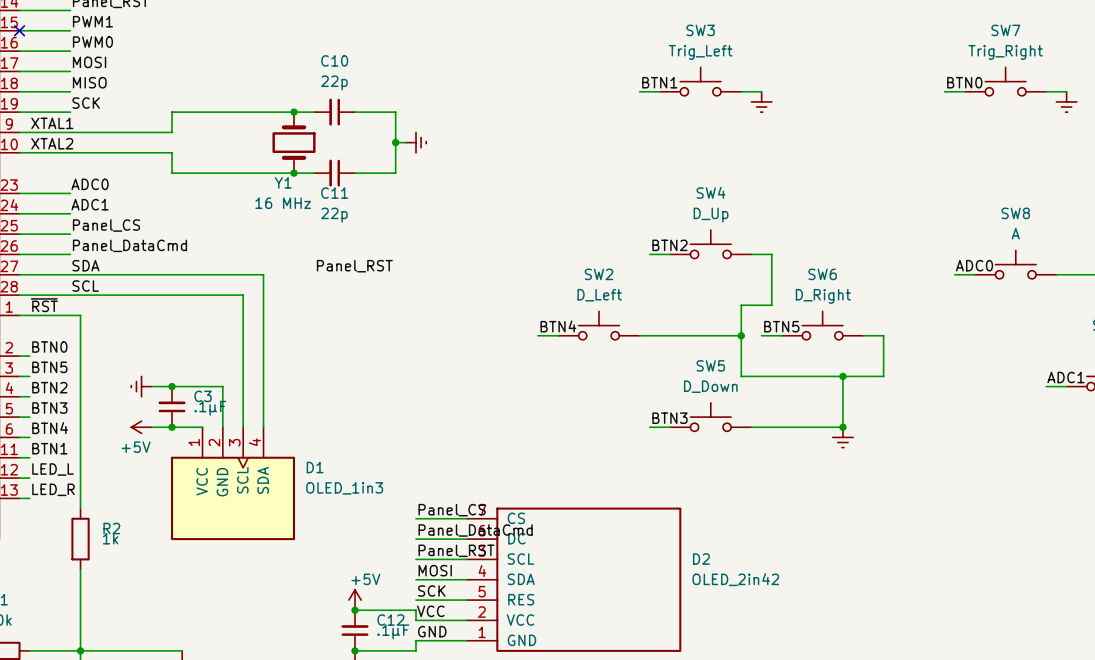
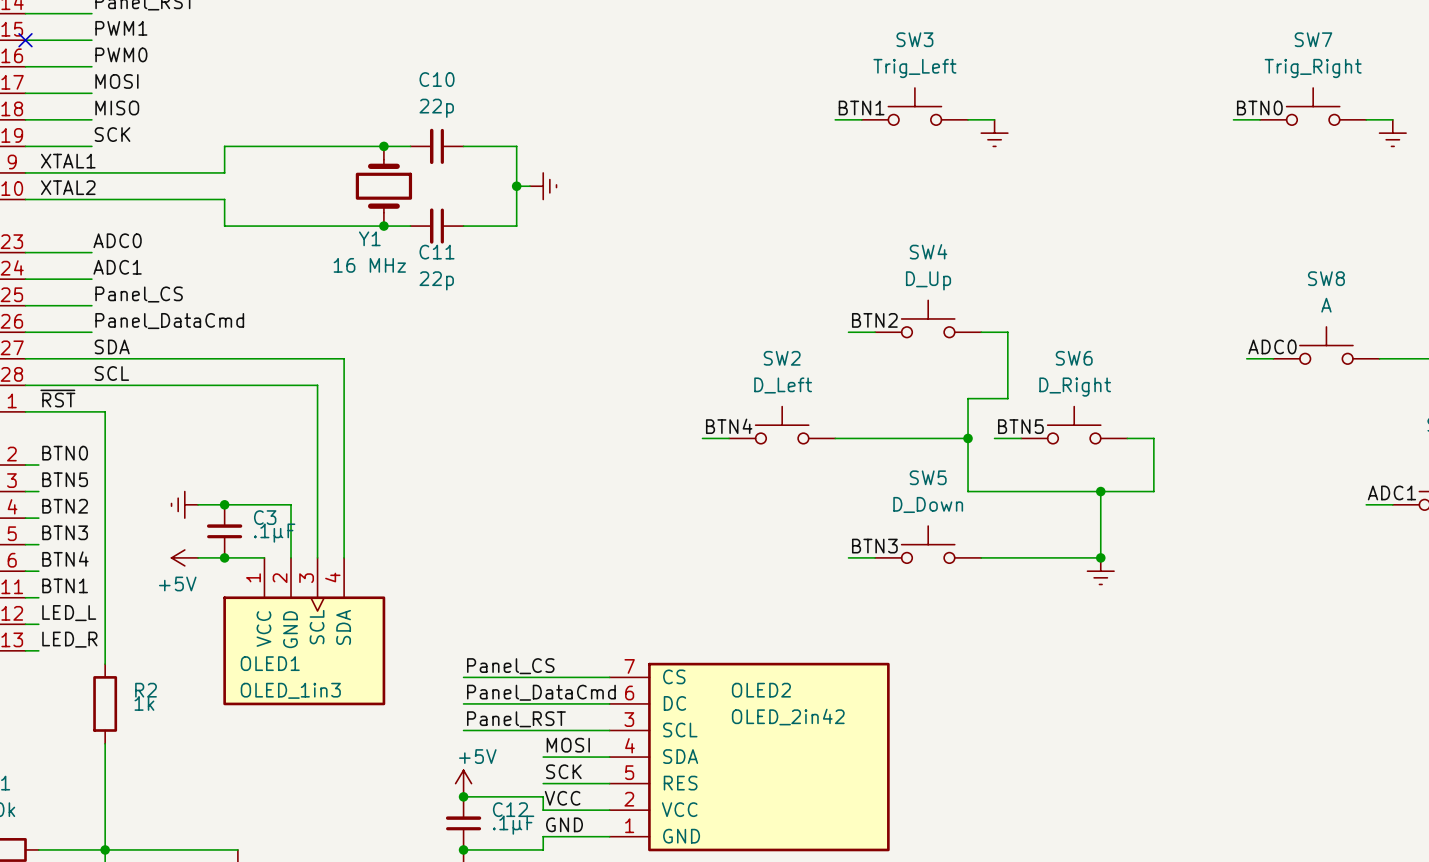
label: Panel_RST (354, 266) -> none
D1 name: D1 (315, 467) -> OLED1 (270, 663)
D1 value position: OLED_1in3 (344, 488) -> OLED_1in3 (290, 690)
label position: Panel_CS (452, 510) -> Panel_CS (510, 666)
wire: none -> (463, 677) (543, 677)
label position: Panel_DataCmd (475, 530) -> Panel_DataCmd (541, 692)
wire: none -> (463, 703) (543, 703)
label position: Panel_RST (456, 550) -> Panel_RST (516, 719)
wire: none -> (463, 730) (543, 730)
D2: OLED_2in42 (574, 579) -> none
OLED2: none -> OLED_2in42 (749, 757)

